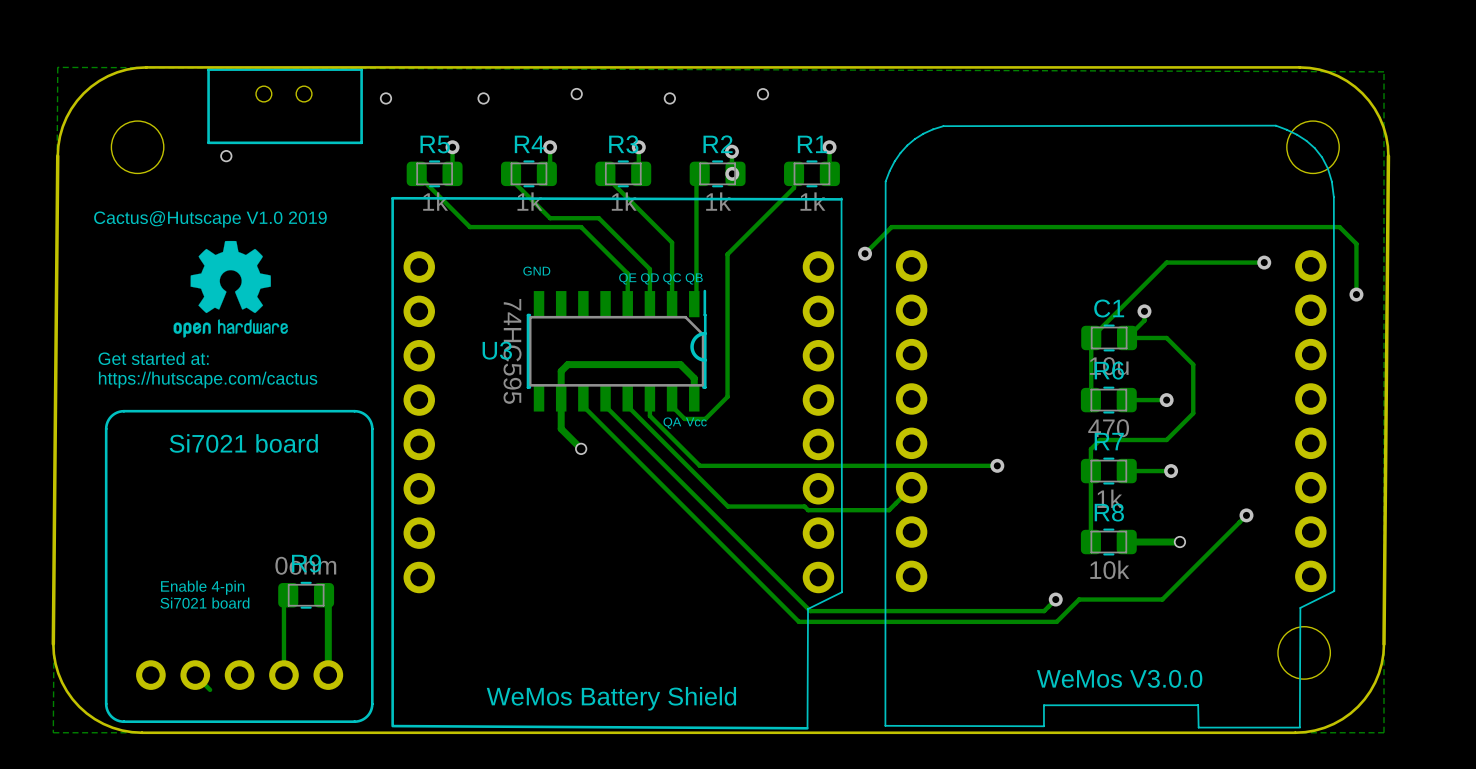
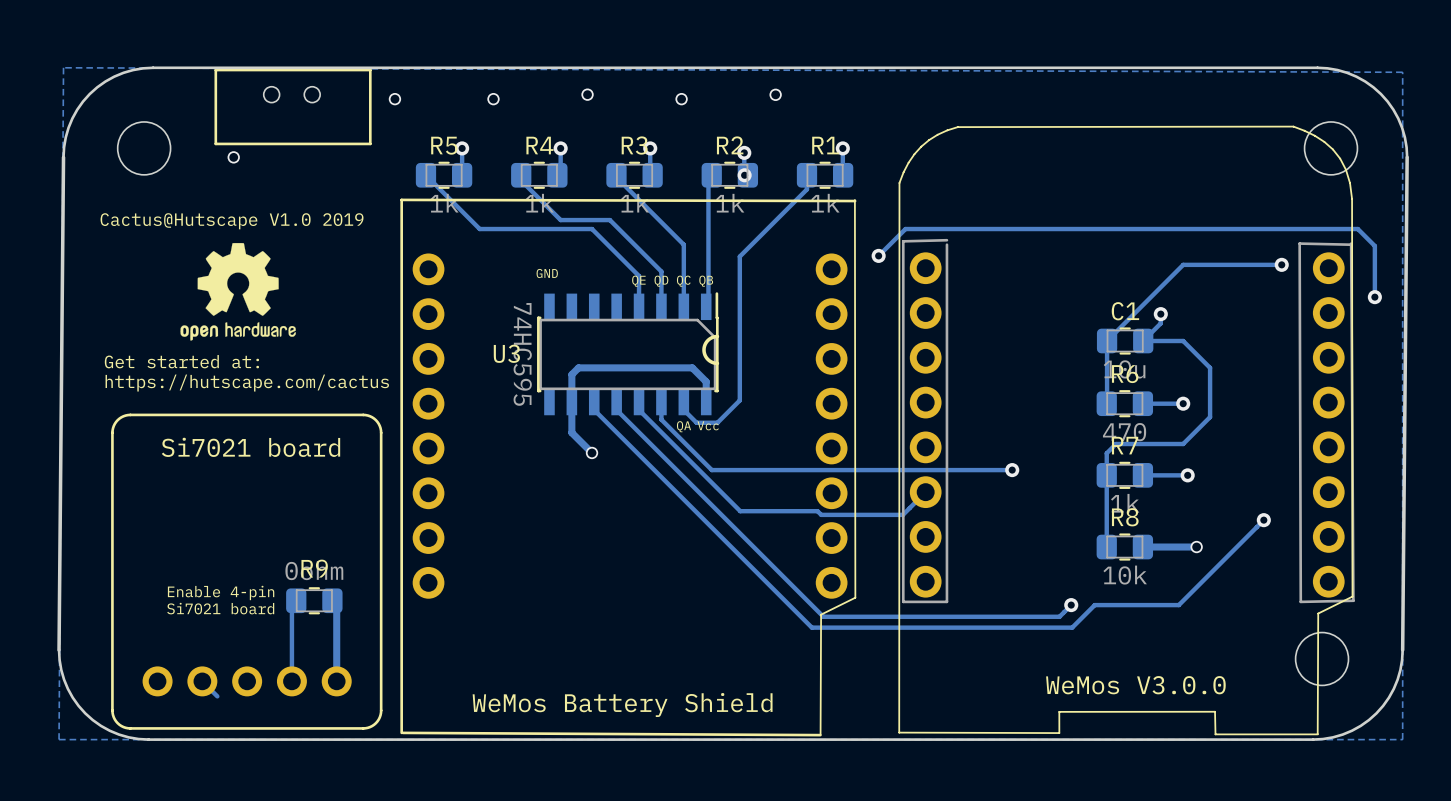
part footprint: [884, 124, 1336, 729] -> [898, 125, 1355, 736]

